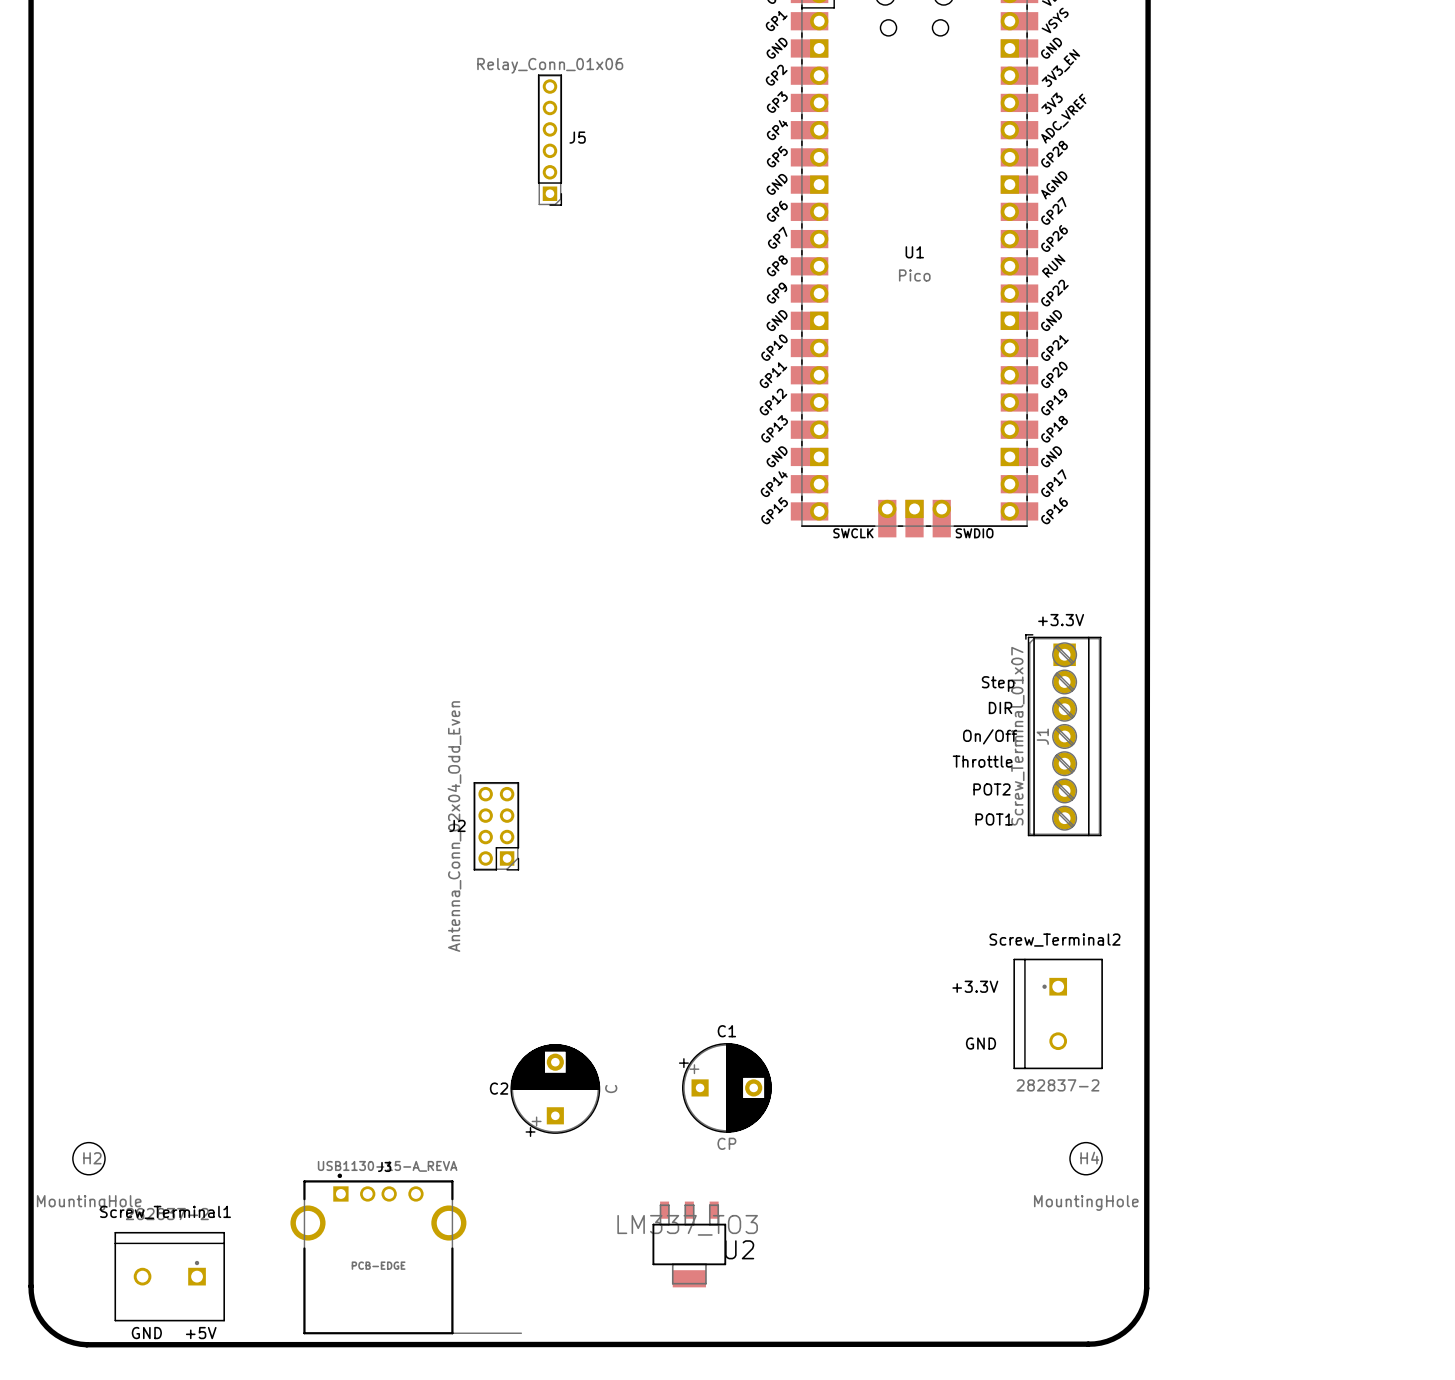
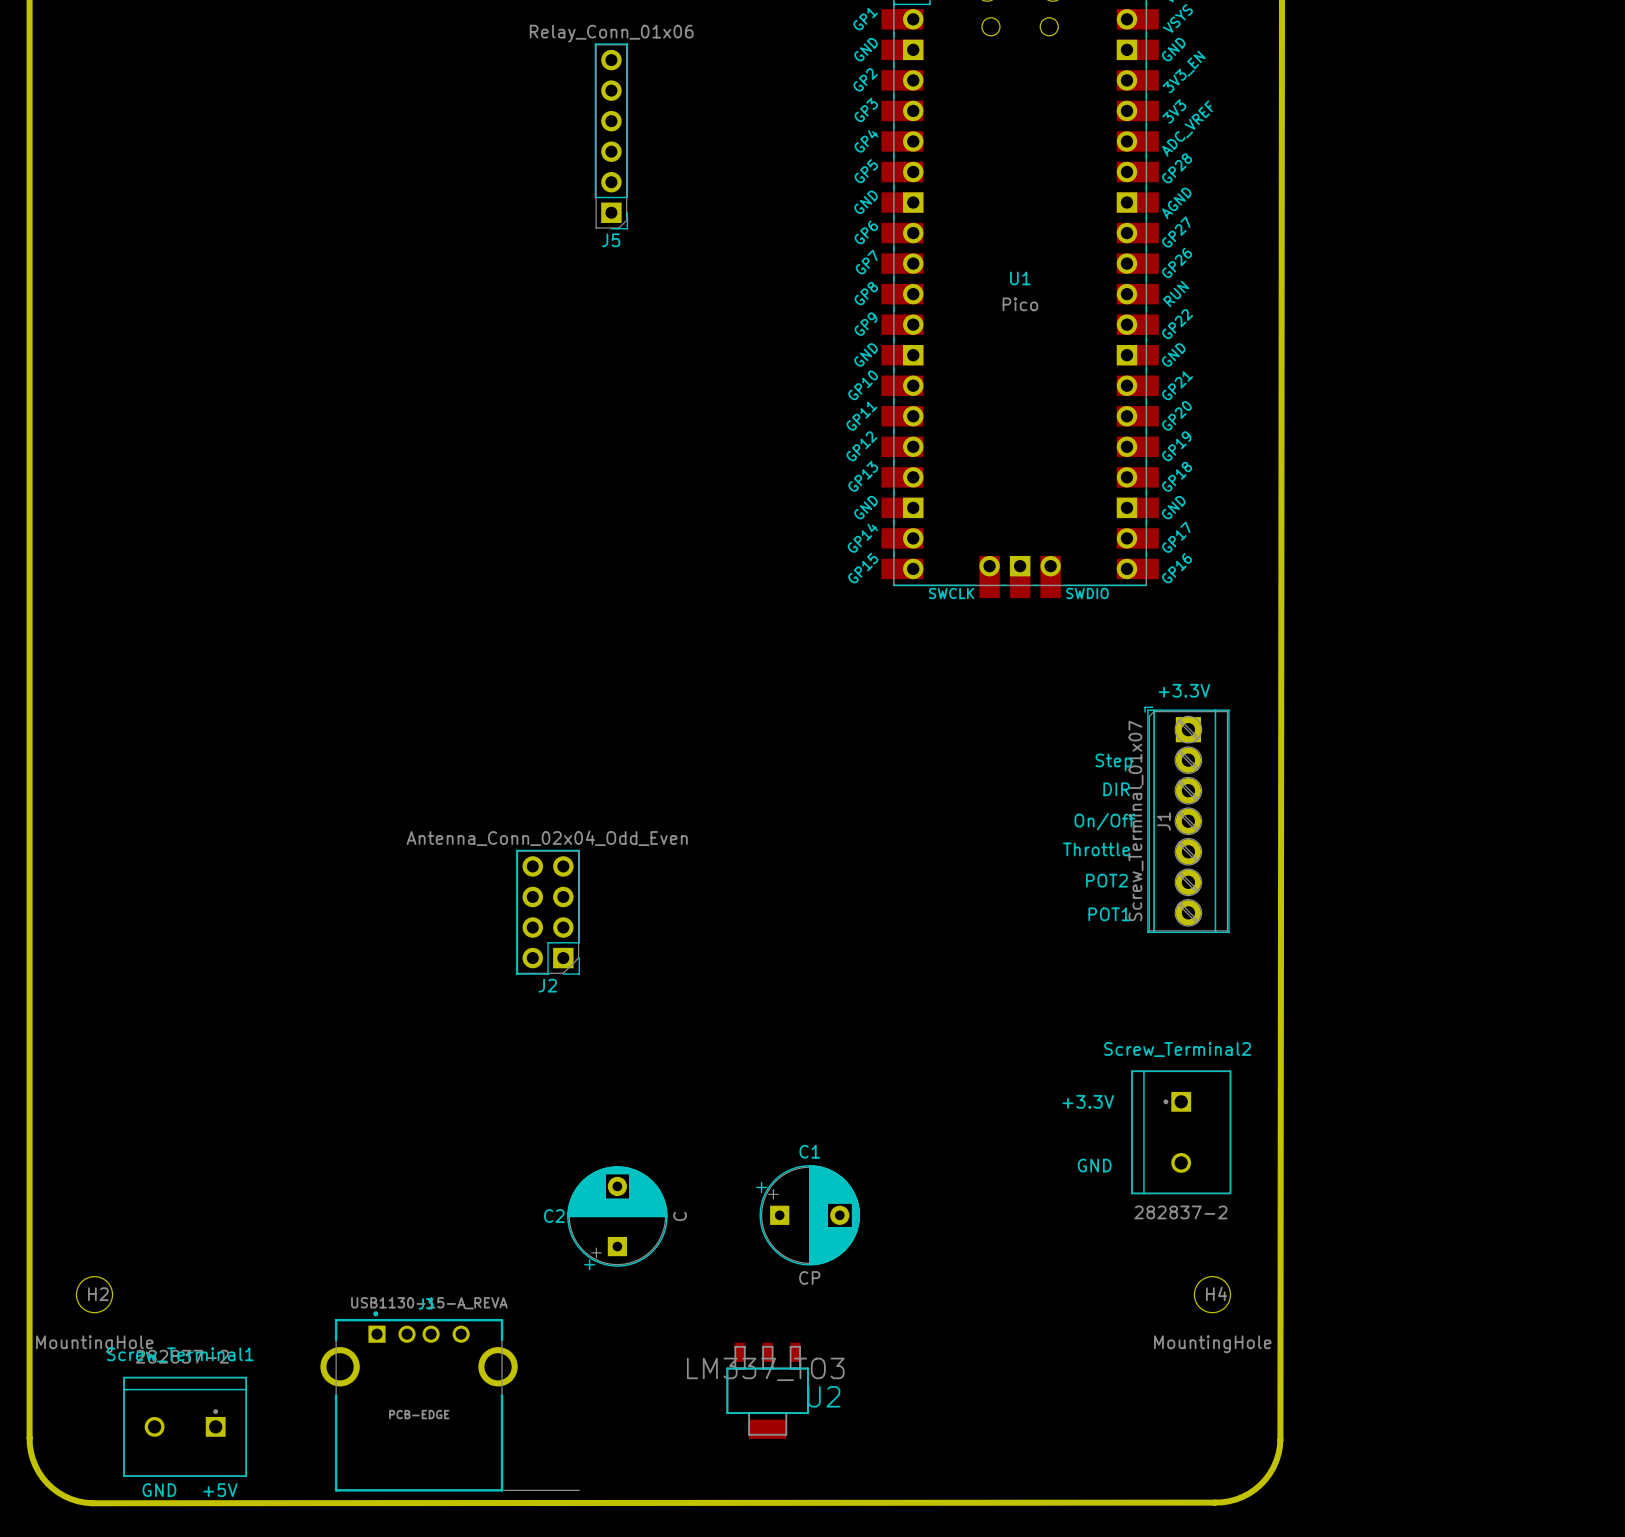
J5 footprint: [537, 74, 562, 206] -> [594, 43, 629, 230]
J5 name position: J5 (577, 137) -> J5 (611, 240)
J2 footprint: [473, 782, 520, 871] -> [516, 849, 581, 975]
J2 name position: J2 (457, 825) -> J2 (547, 985)
J2 value position: Antenna_Conn_02x04_Odd_Even (454, 826) -> Antenna_Conn_02x04_Odd_Even (547, 838)

